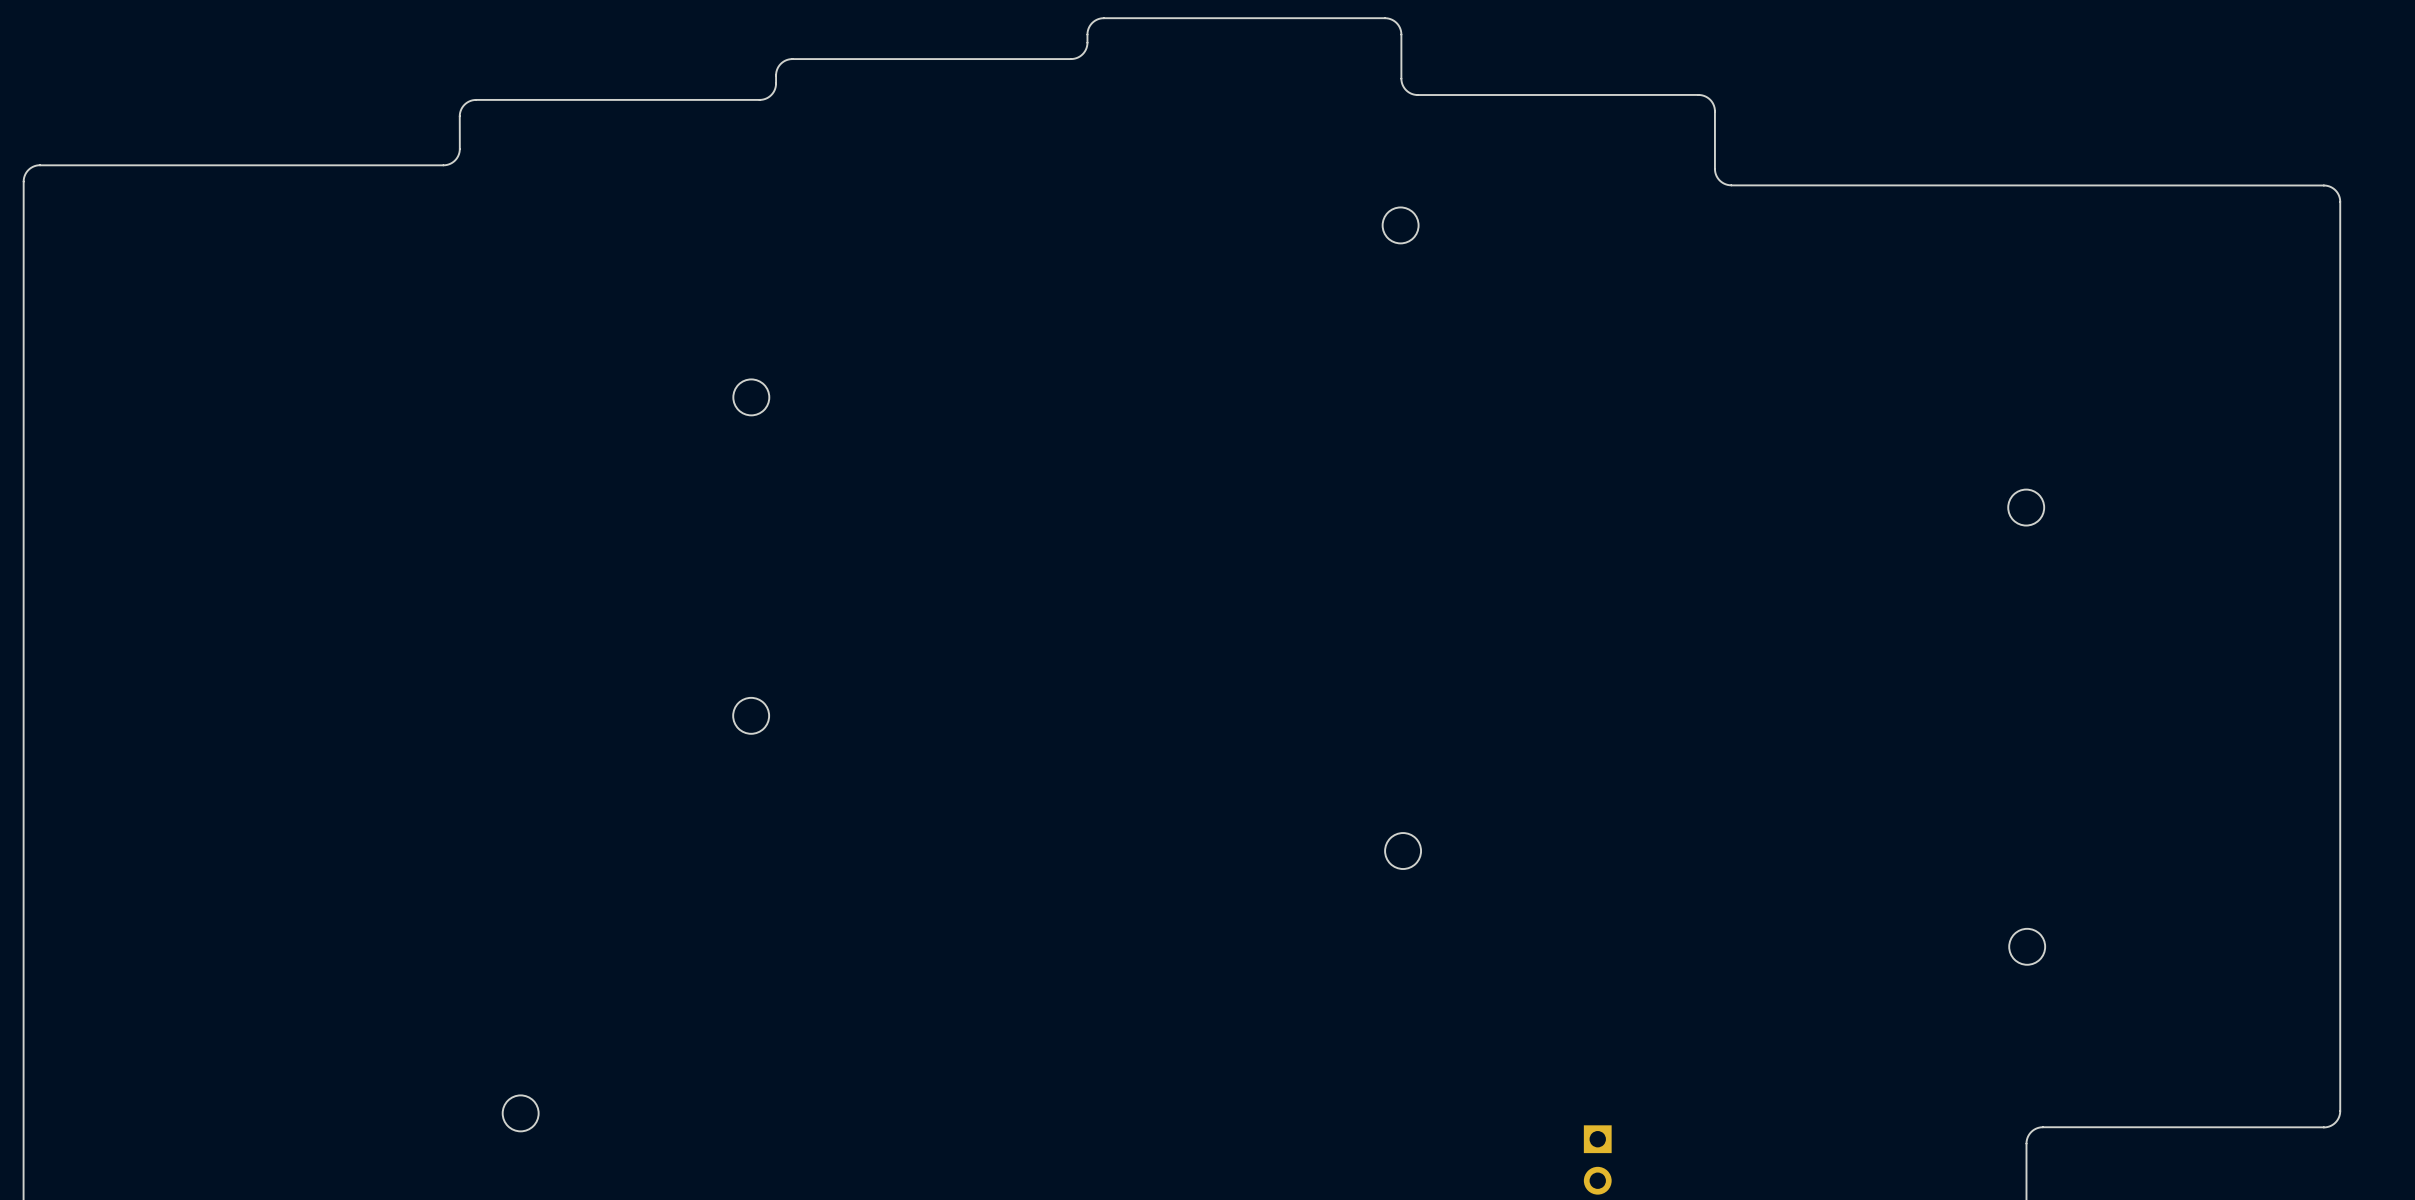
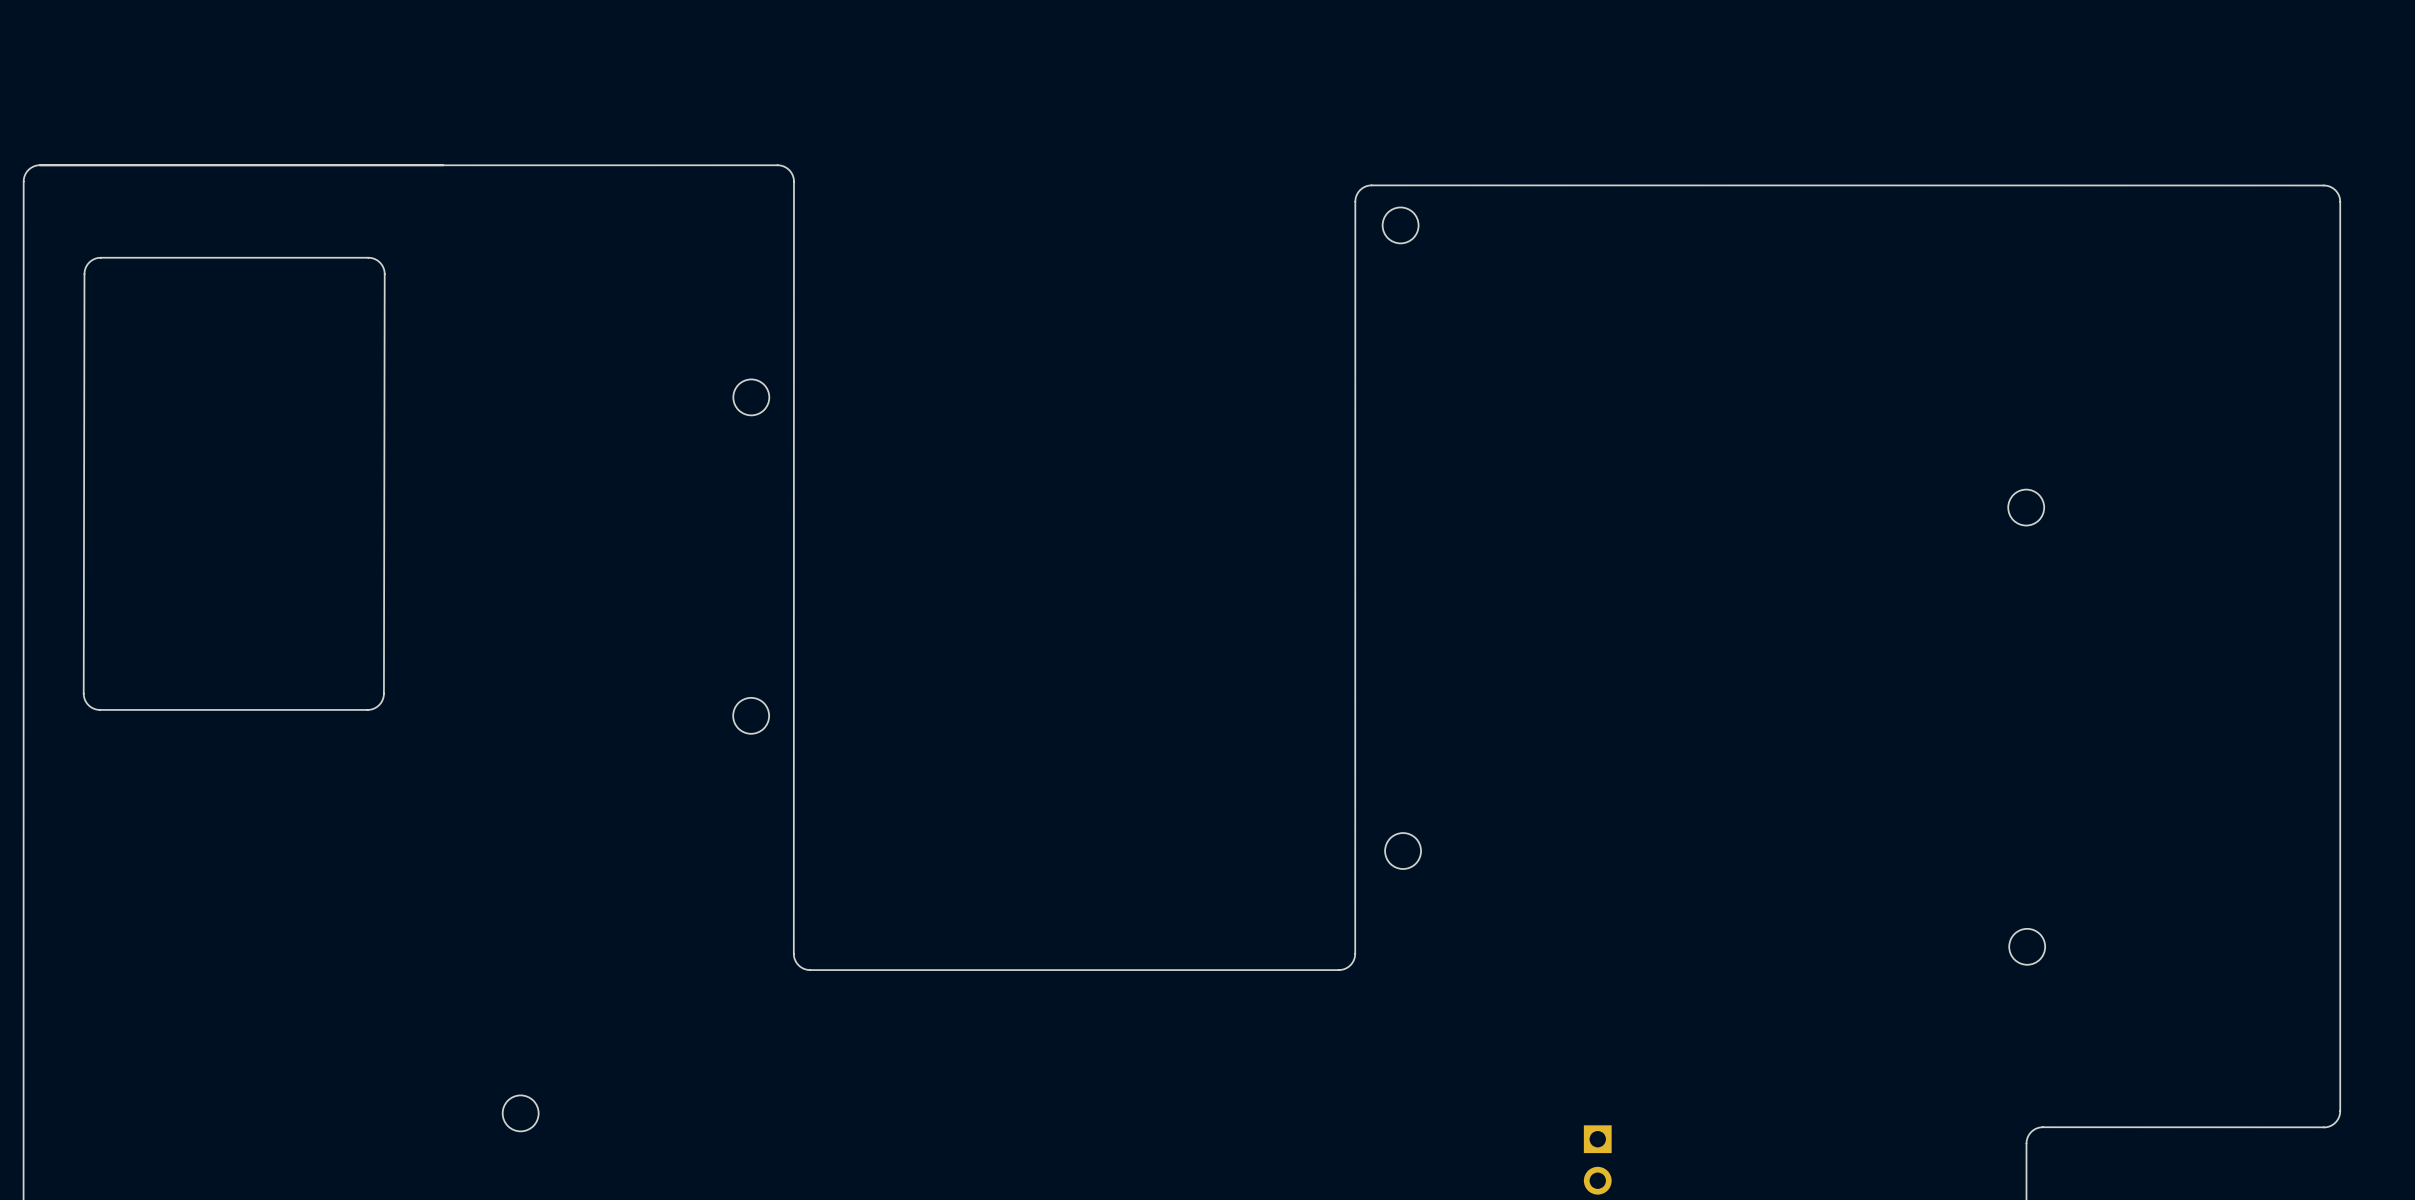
board edge: (443, 165) (452, 162) (458, 156) (460, 110) (465, 103) (474, 100) (761, 99) (772, 93) (775, 87) (777, 68) (783, 61) (790, 59) (1074, 58) (1081, 55) (1085, 49) (1089, 25) (1095, 20) (1101, 18) (1385, 18) (1393, 20) (1400, 29) (1401, 82) (1406, 90) (1414, 94) (1698, 94) (1705, 96) (1712, 102) (1714, 109) (1714, 168) -> none
board edge: (1714, 168) (1719, 180) (1731, 185) (2323, 185) -> (40, 165) (777, 165) (789, 170) (793, 181) (793, 953) (798, 965) (810, 970) (1338, 970) (1345, 968) (1352, 962) (1355, 953) (1355, 201) (1357, 193) (1364, 186) (1371, 185) (2323, 185)
board edge: none -> (100, 257) (368, 257) (377, 260) (382, 265) (384, 274) (383, 693) (381, 702) (376, 707) (367, 709) (100, 709) (91, 707) (86, 702) (83, 693) (84, 274) (89, 262) (100, 257)

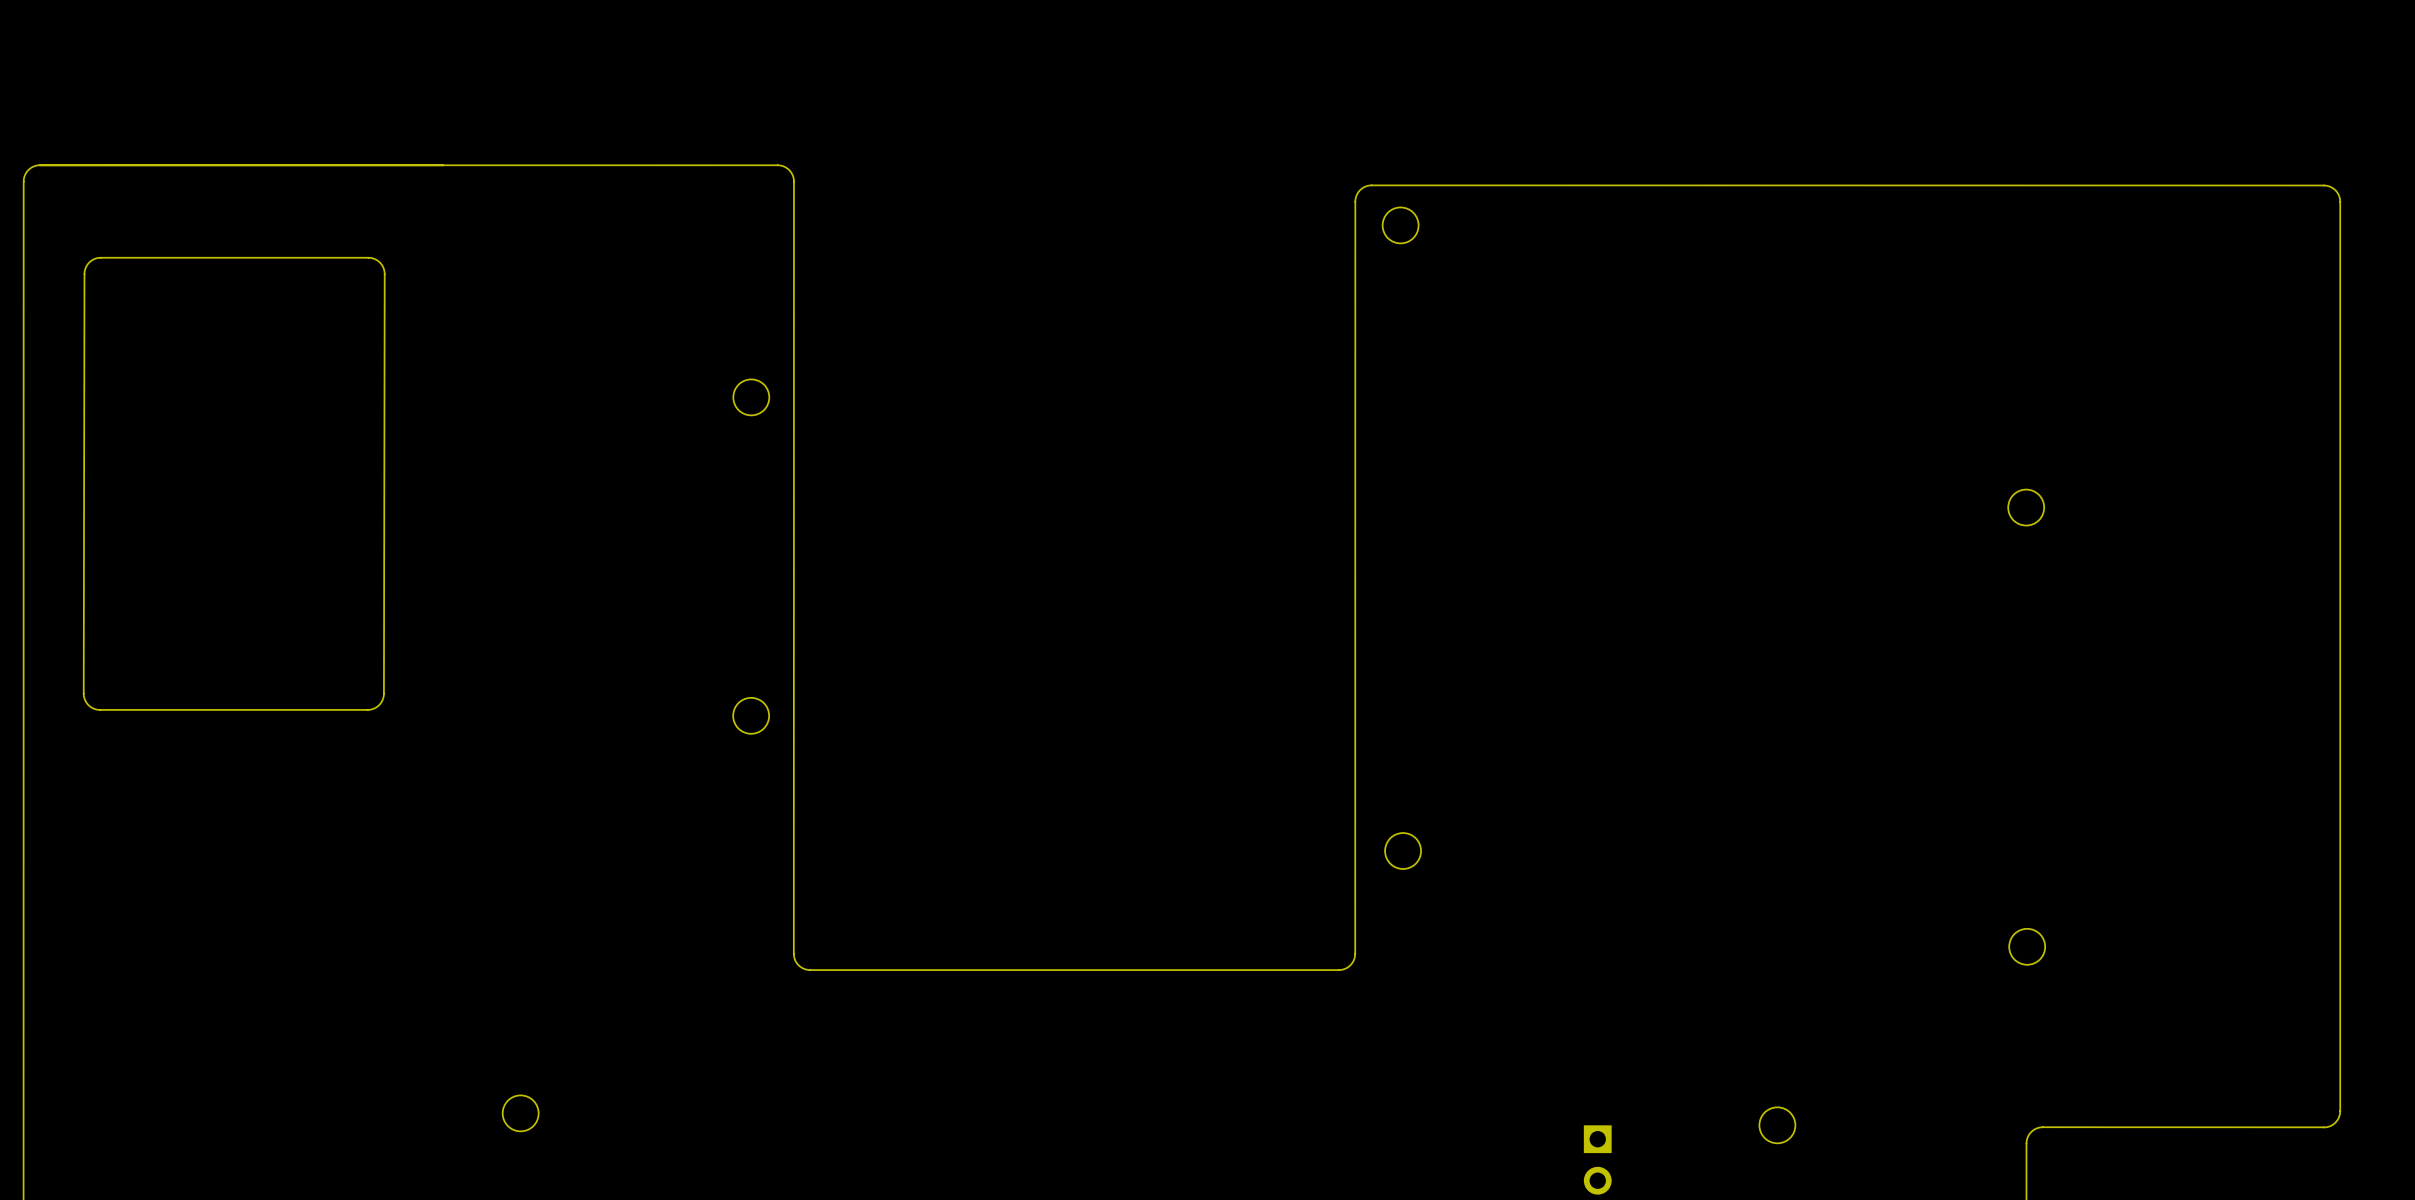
drawing: none -> [1759, 1107, 1796, 1144]

